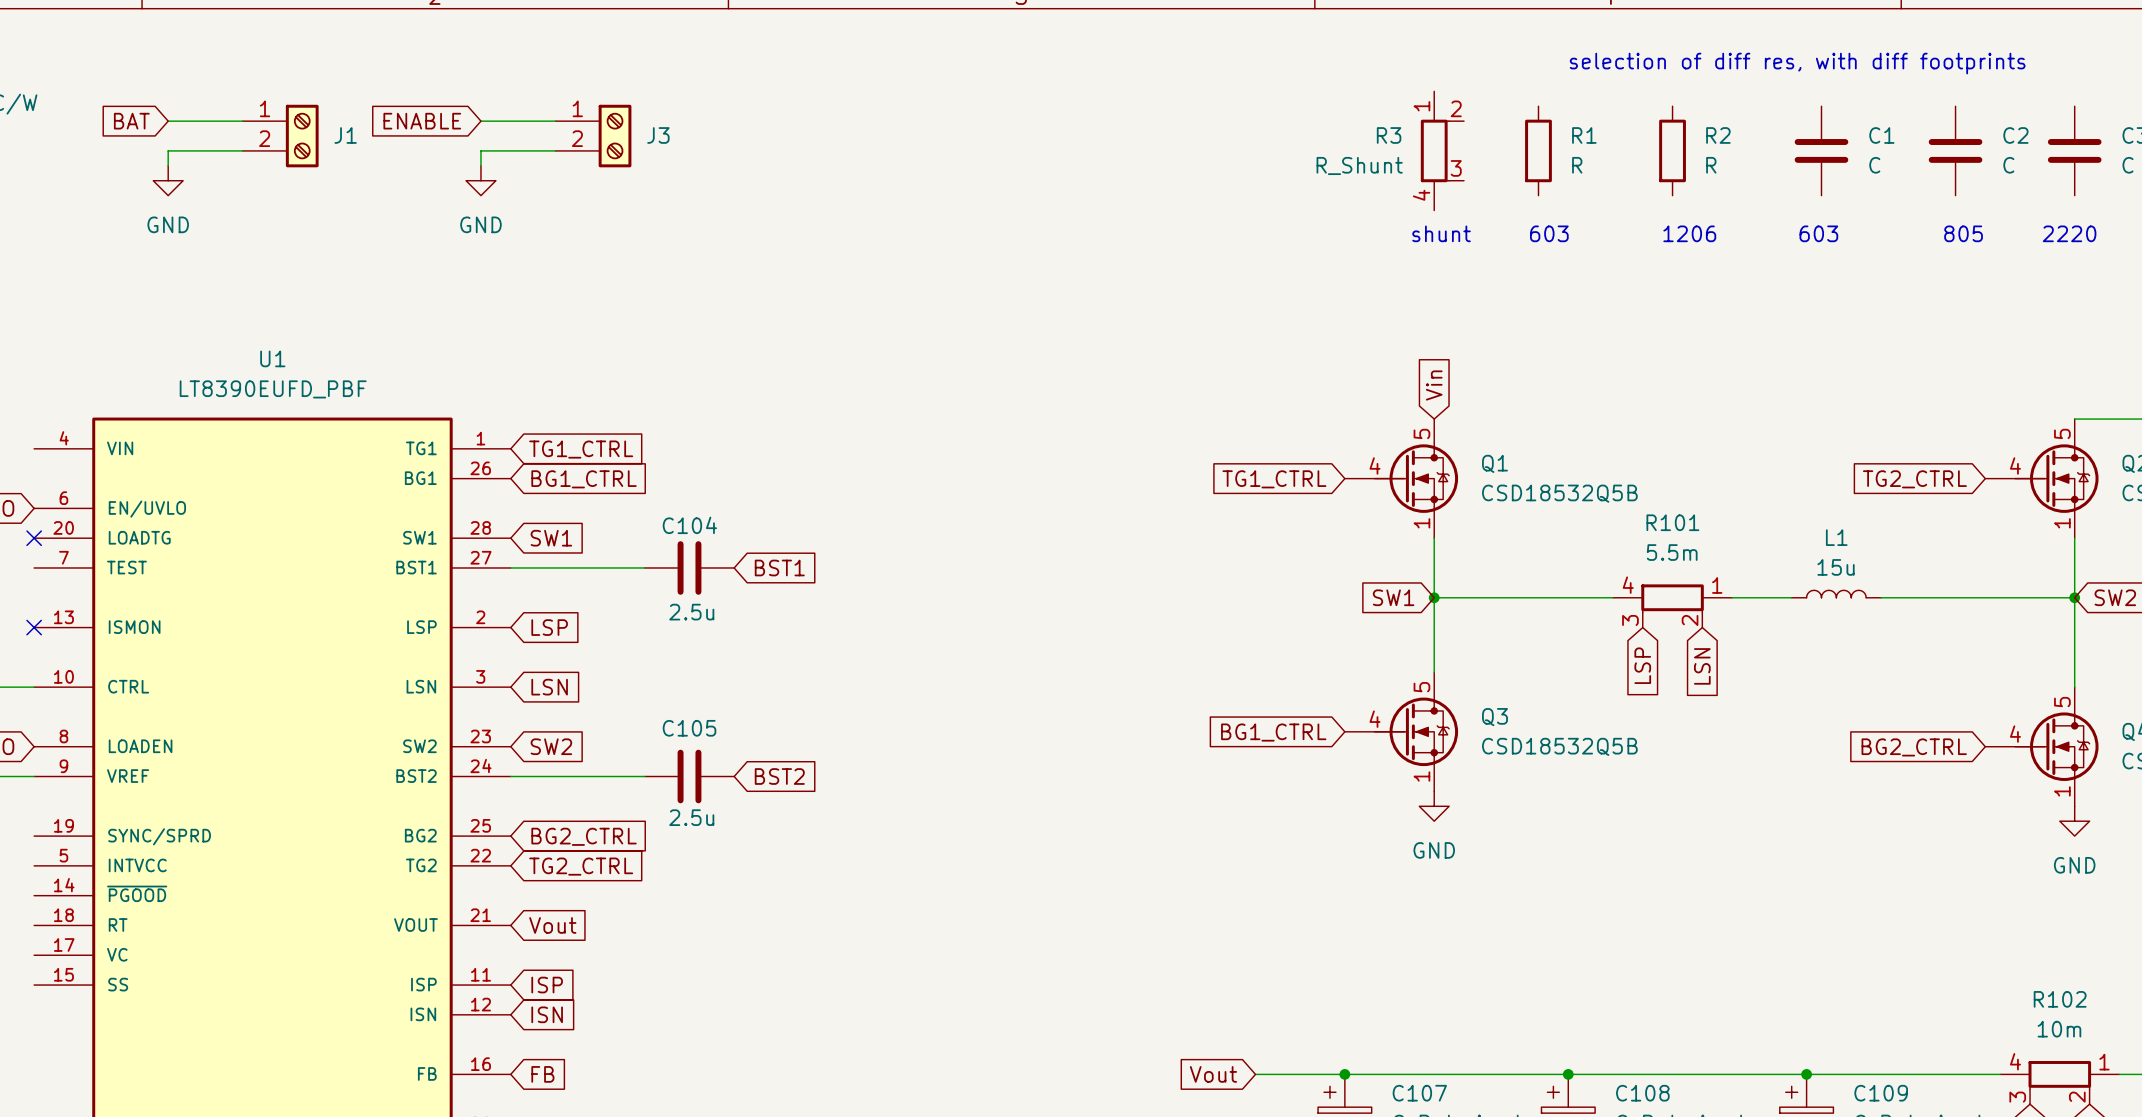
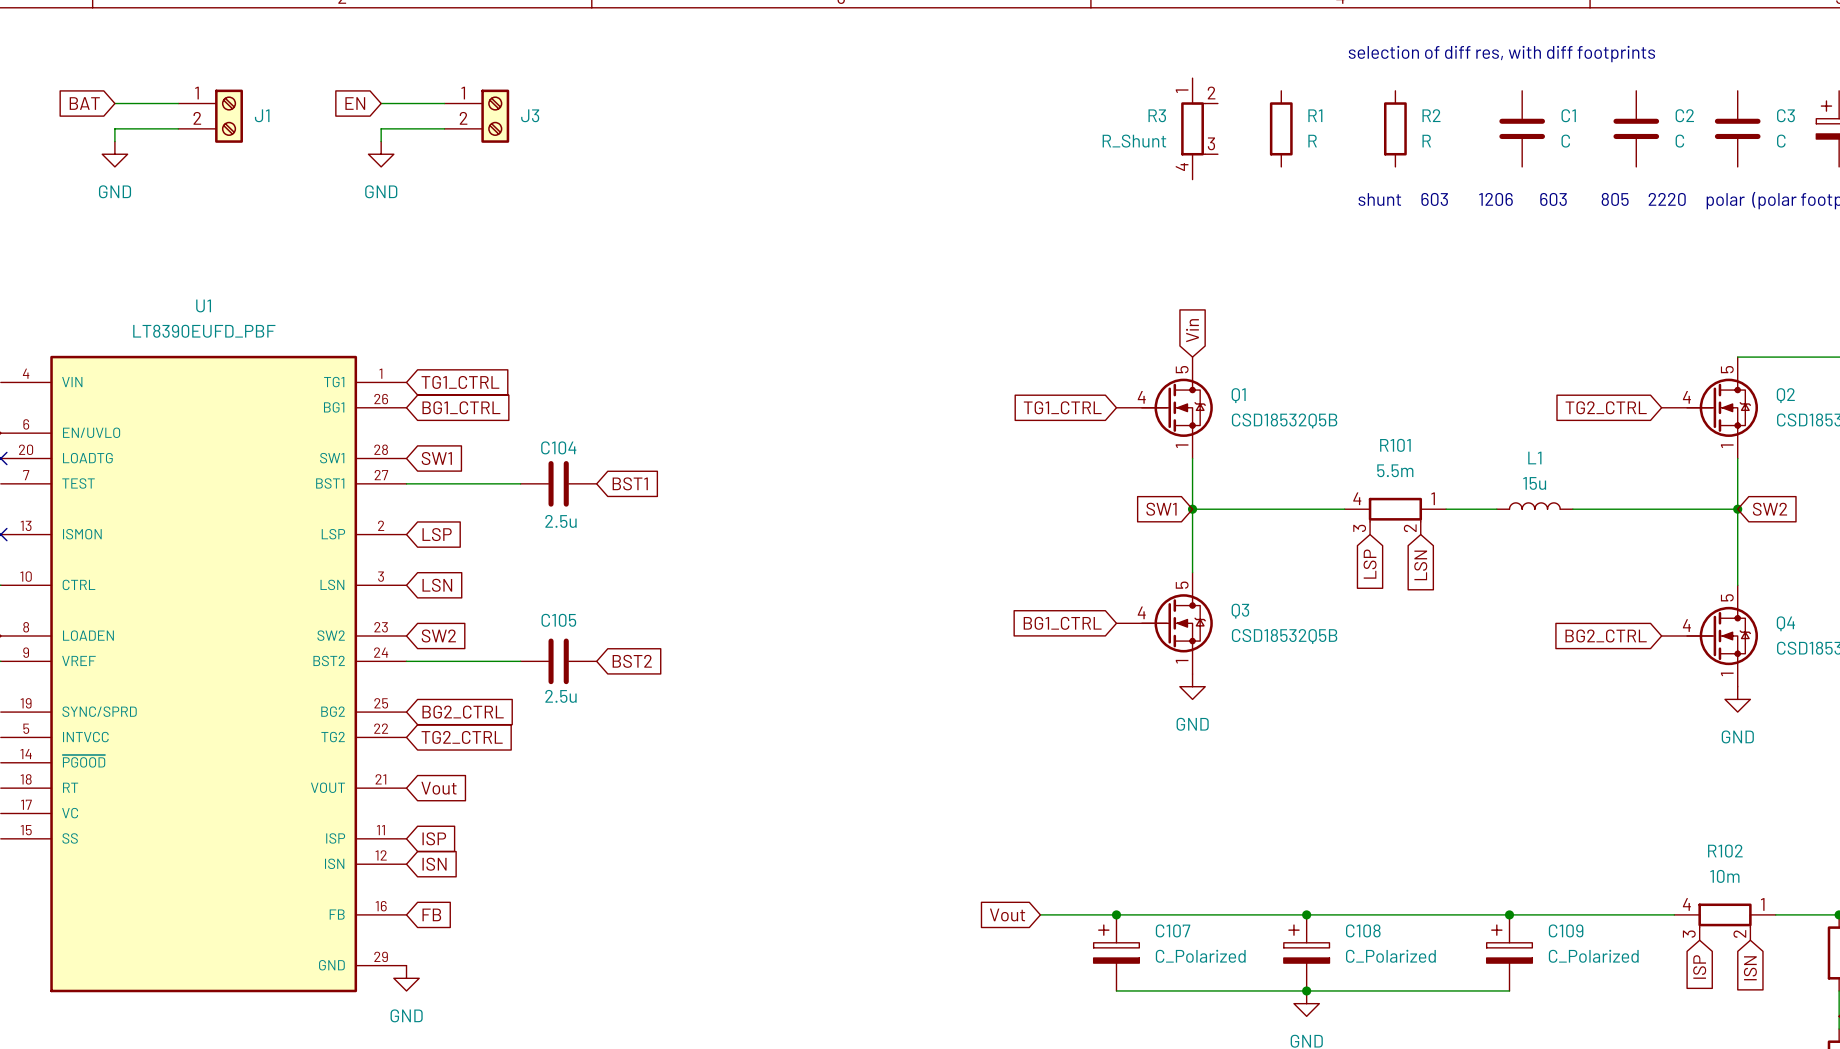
global label: ENABLE (422, 121) -> EN (355, 103)

